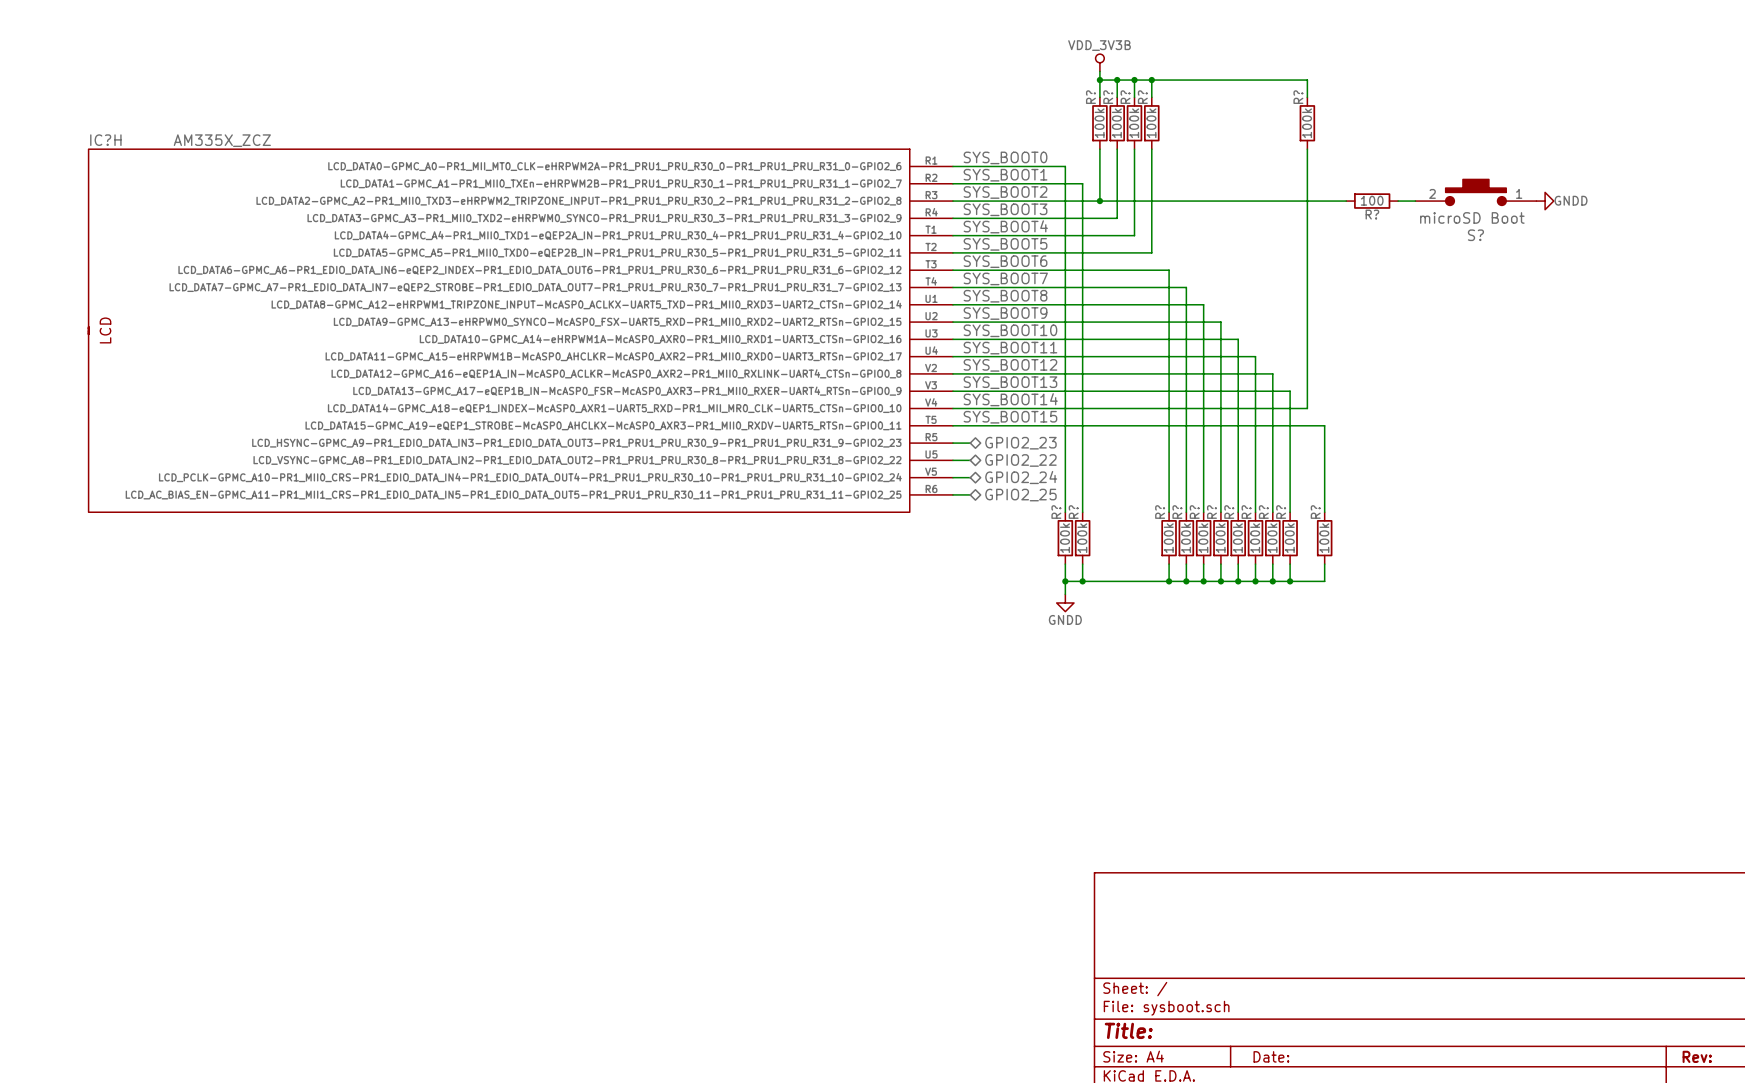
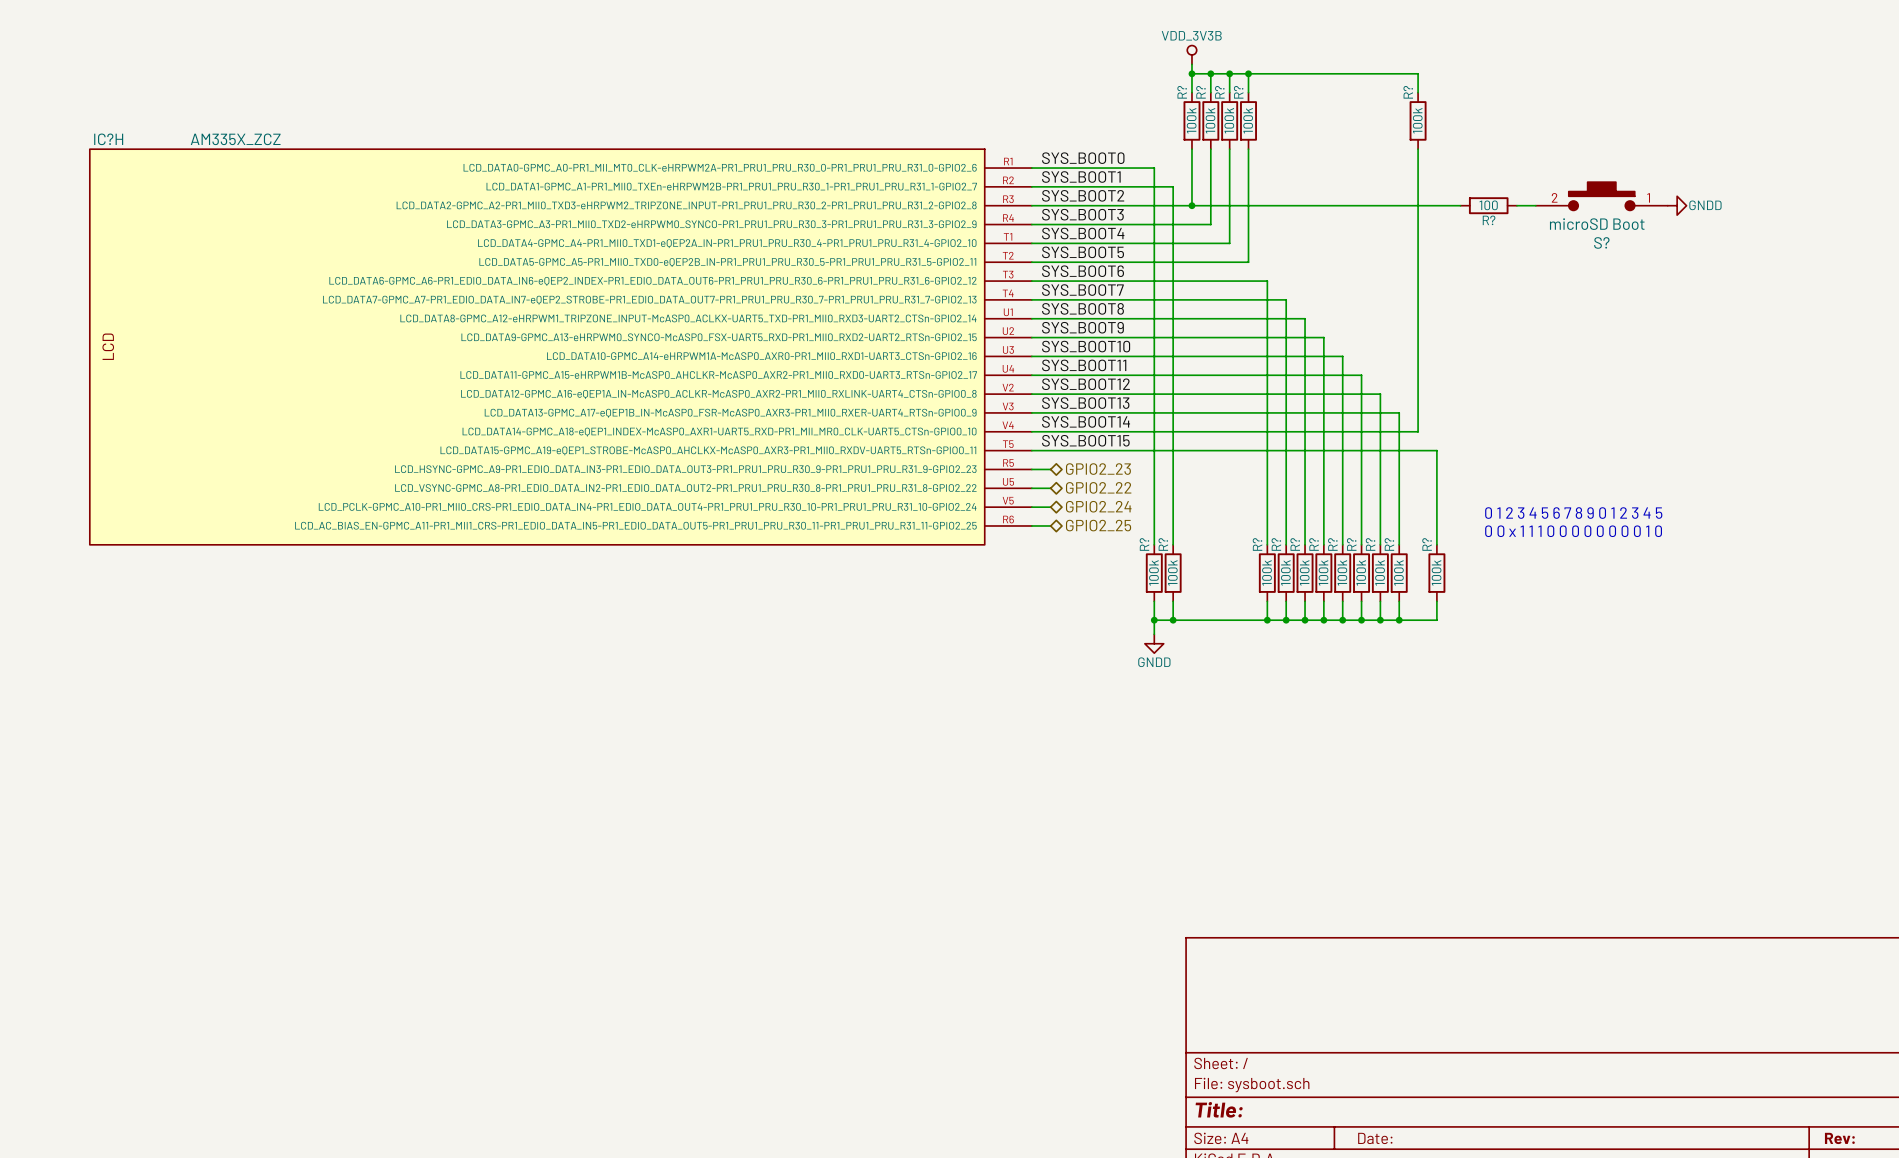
text: none -> 0 1 2 3 4 5 6 7 8 9 0 1 2 3 4 5 (1573, 513)
text: none -> 0 0 x 1 1 1 0 0 0 0 0 0 0 0 1 0 (1573, 531)

